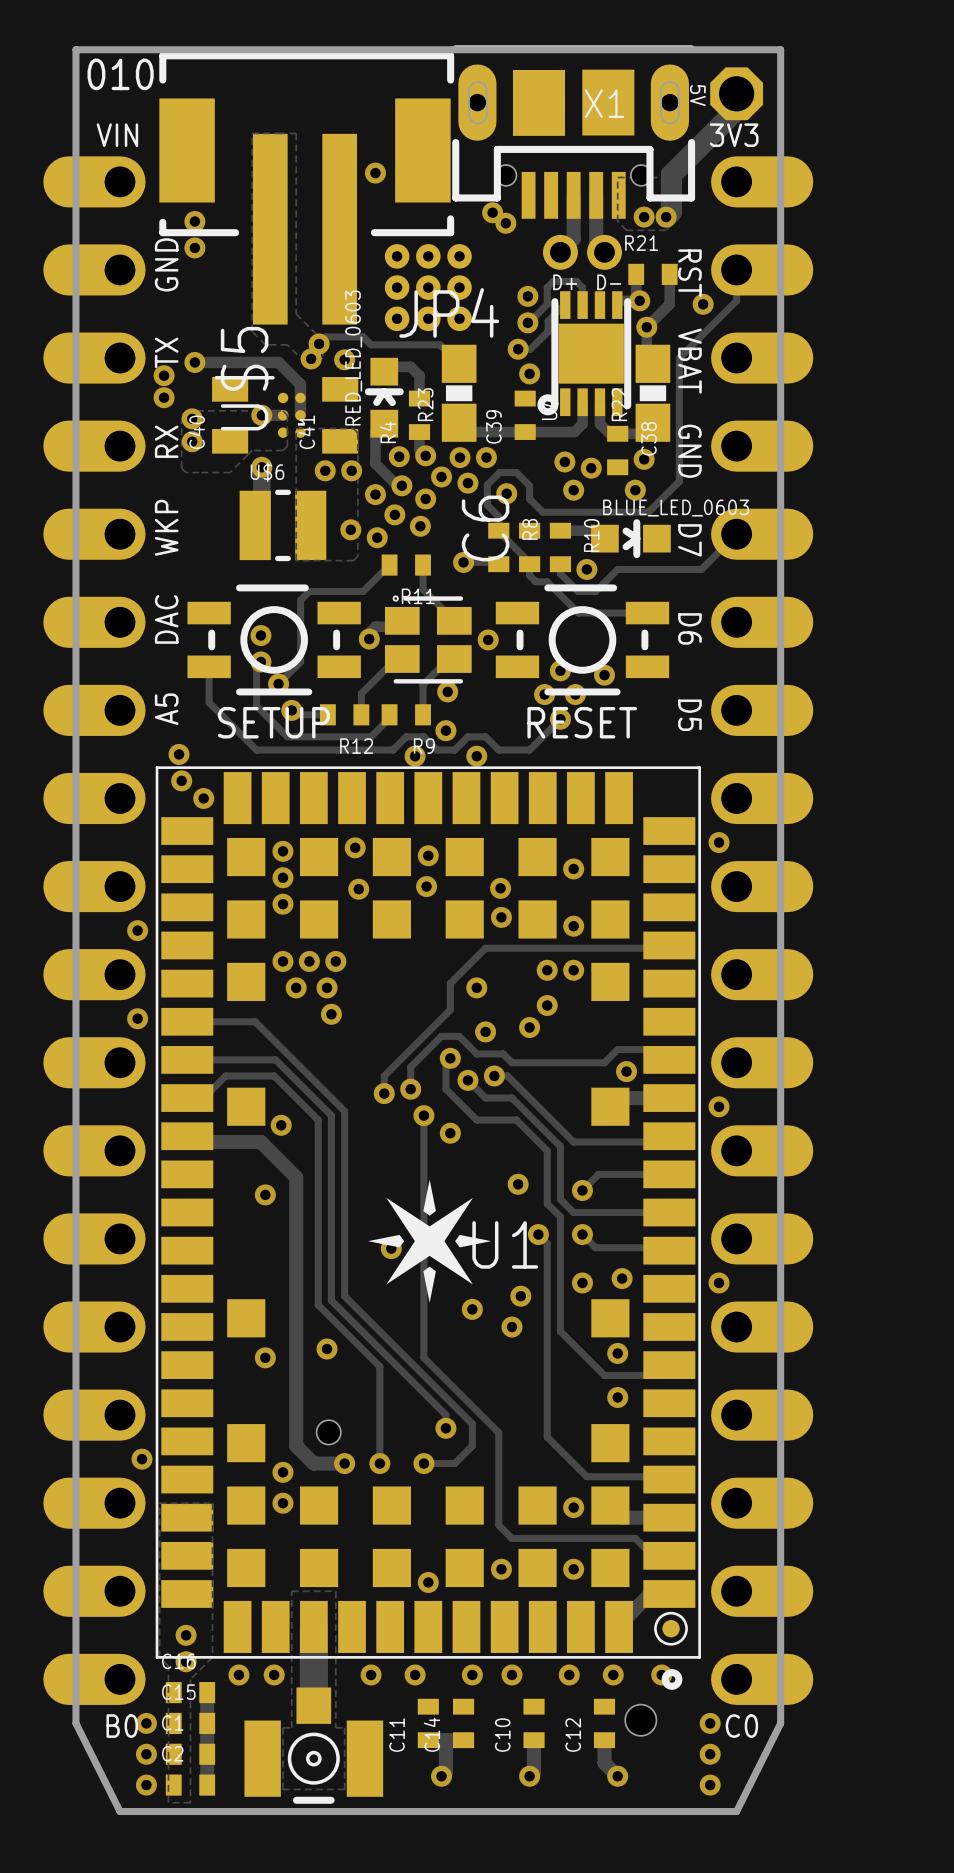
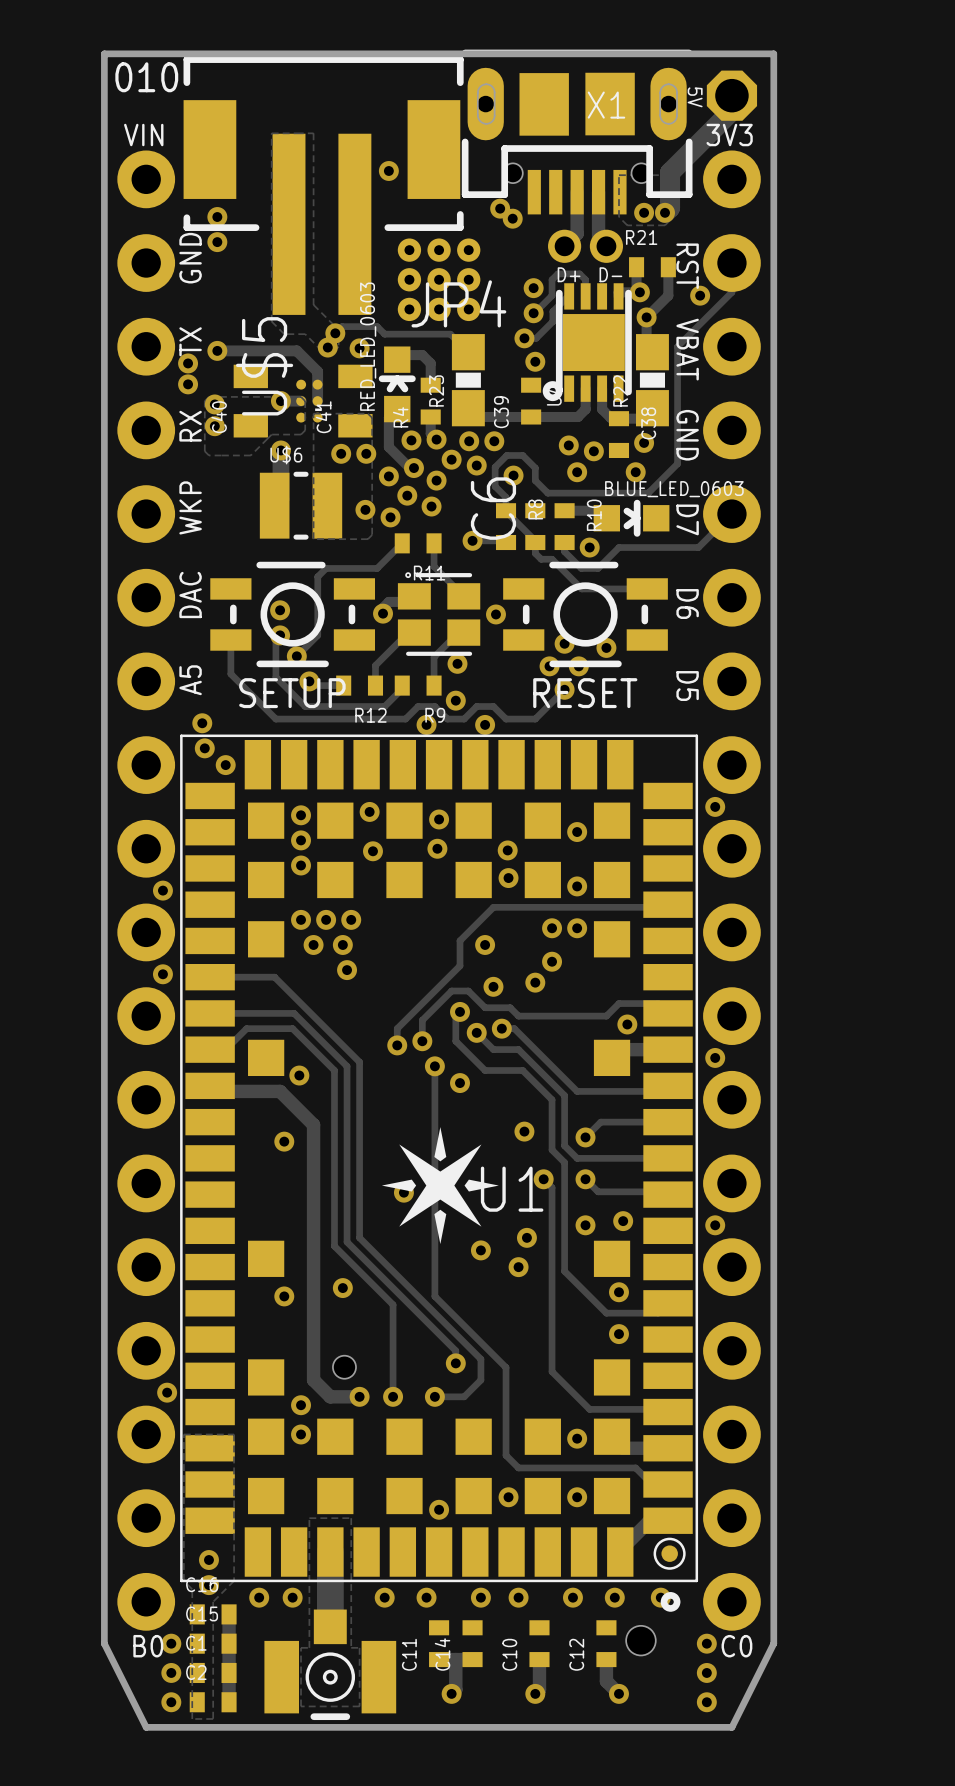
part footprint: [43, 156, 146, 1705] -> [117, 150, 176, 1631]
part footprint: [711, 156, 814, 1705] -> [703, 150, 761, 1631]

